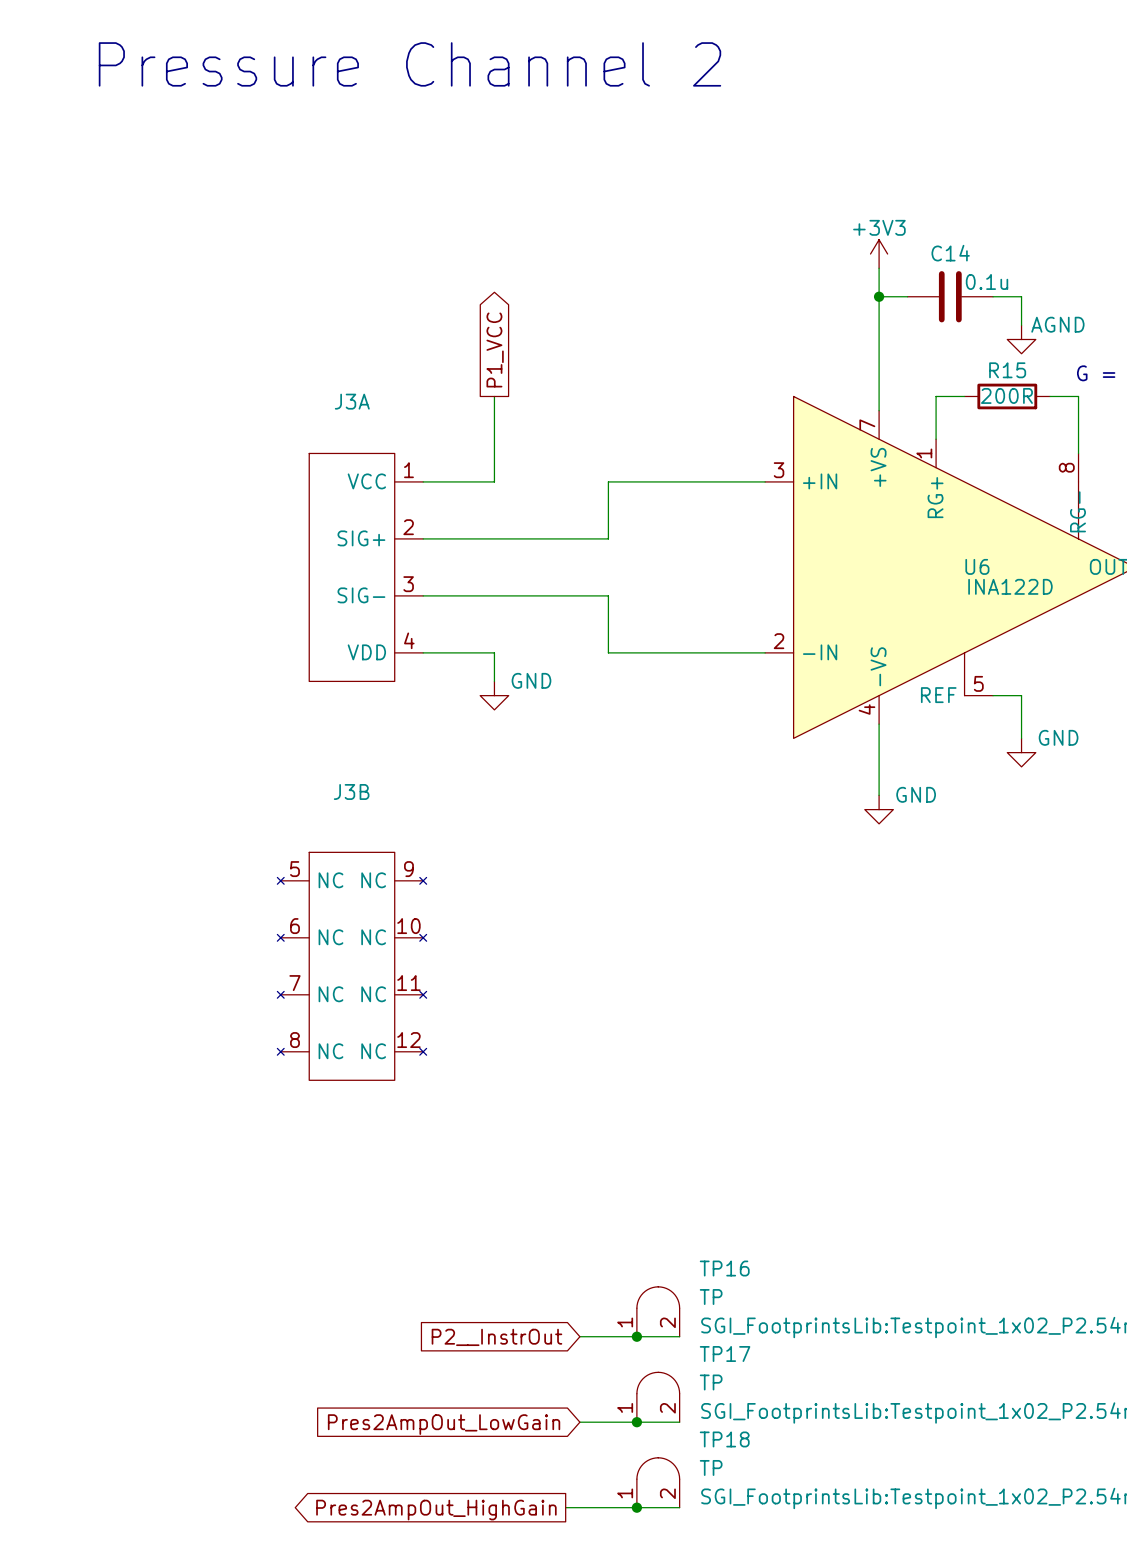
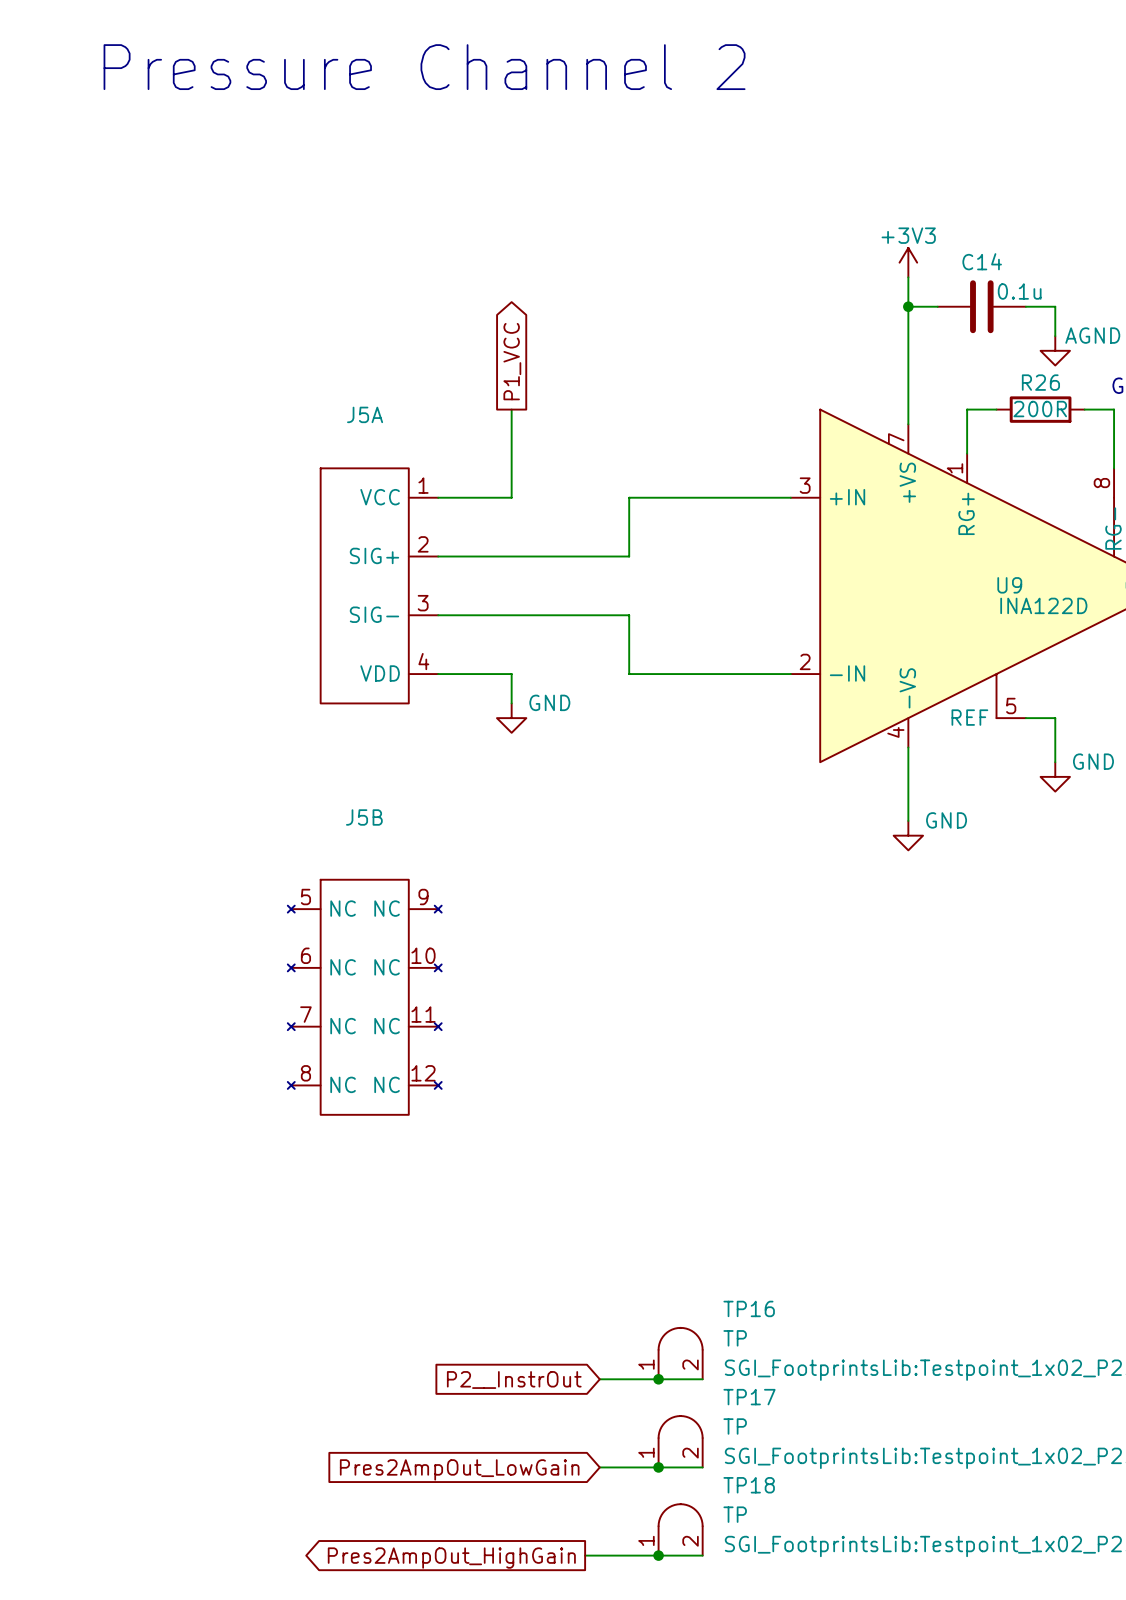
R15 name: R15 (1007, 370) -> R26 (1040, 382)
J3A name: J3A (352, 401) -> J5A (365, 414)
U6 name: U6 (977, 566) -> U9 (1009, 585)
J3B name: J3B (351, 791) -> J5B (364, 817)

